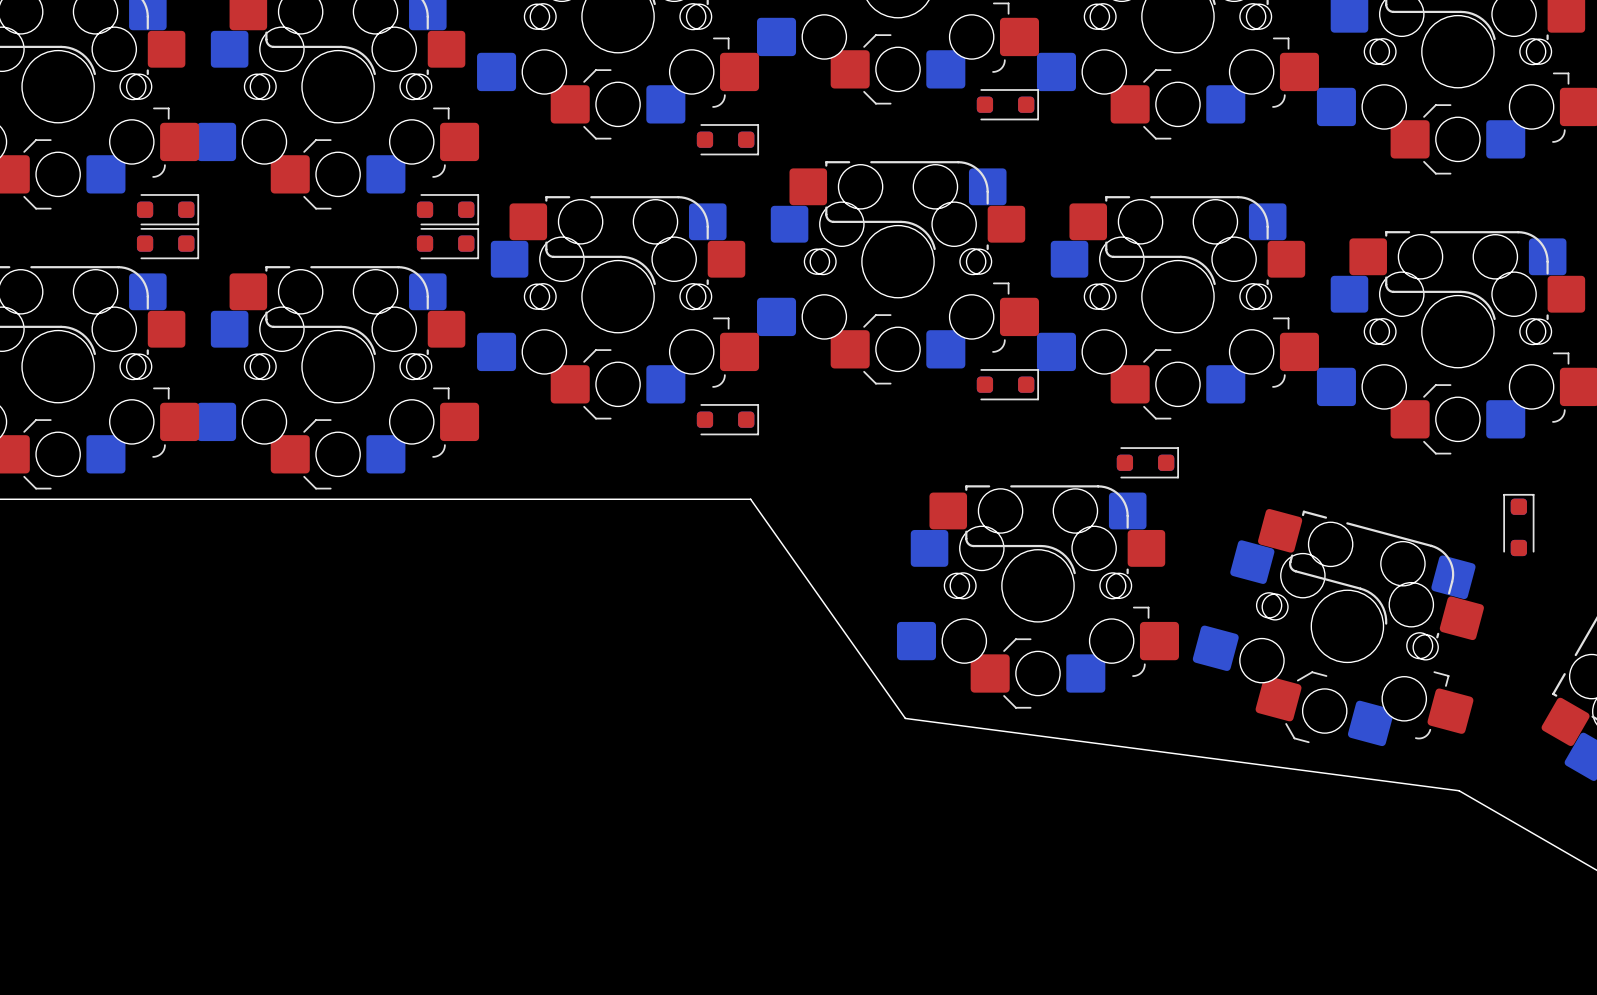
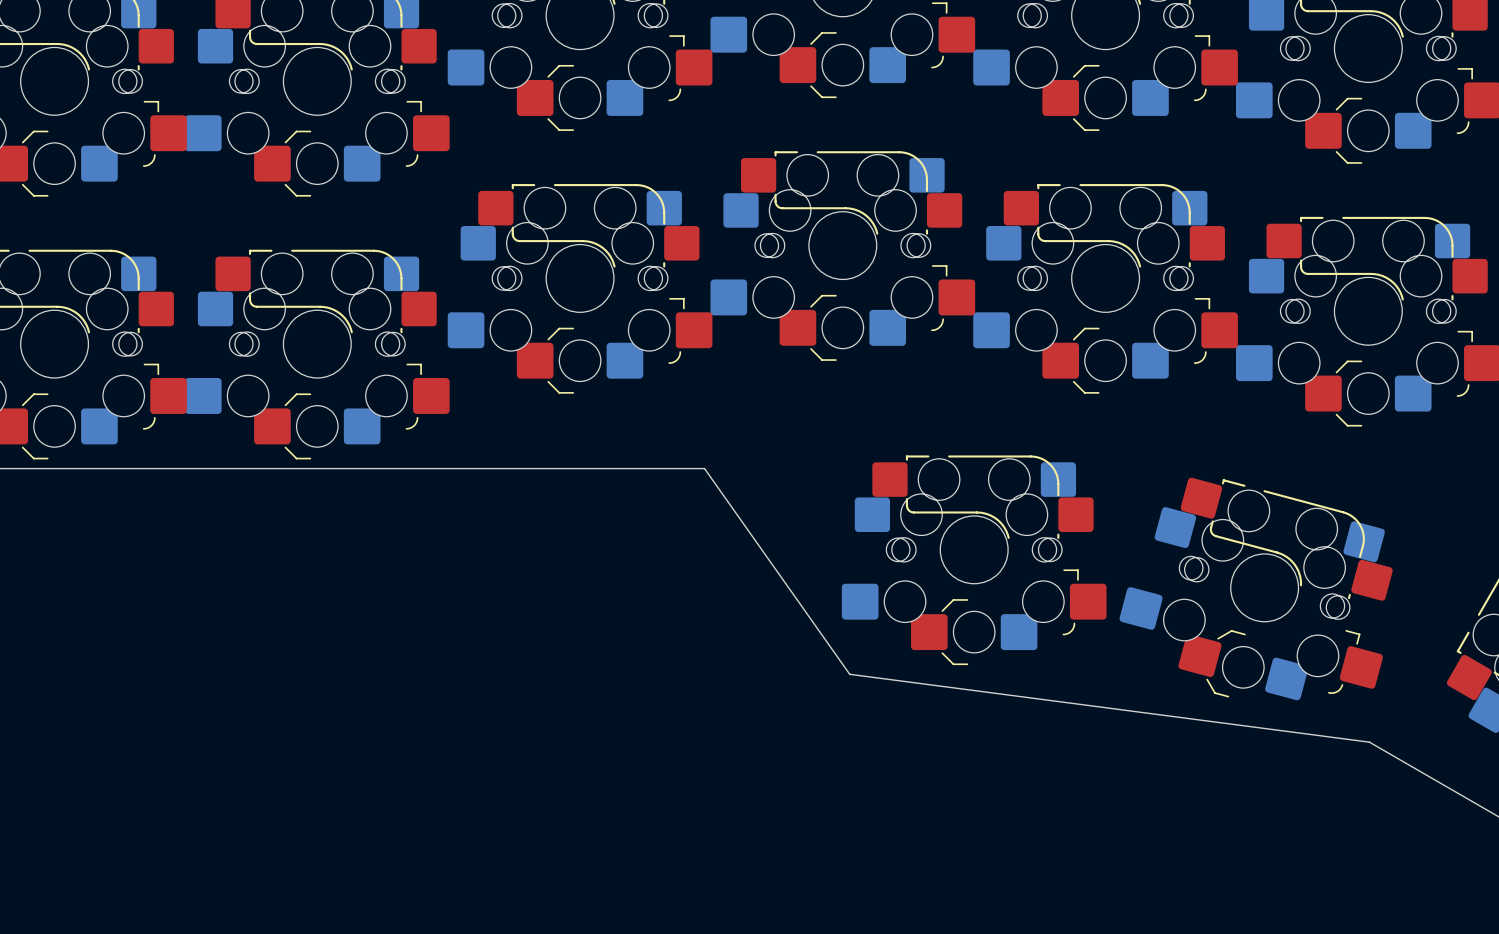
part: (1007, 104) -> none
part: (727, 139) -> none
part: (168, 209) -> none
part: (448, 209) -> none
part: (168, 243) -> none
part: (448, 243) -> none
part: (1007, 384) -> none
part: (727, 419) -> none
part: (1147, 462) -> none
part: (1518, 525) -> none

